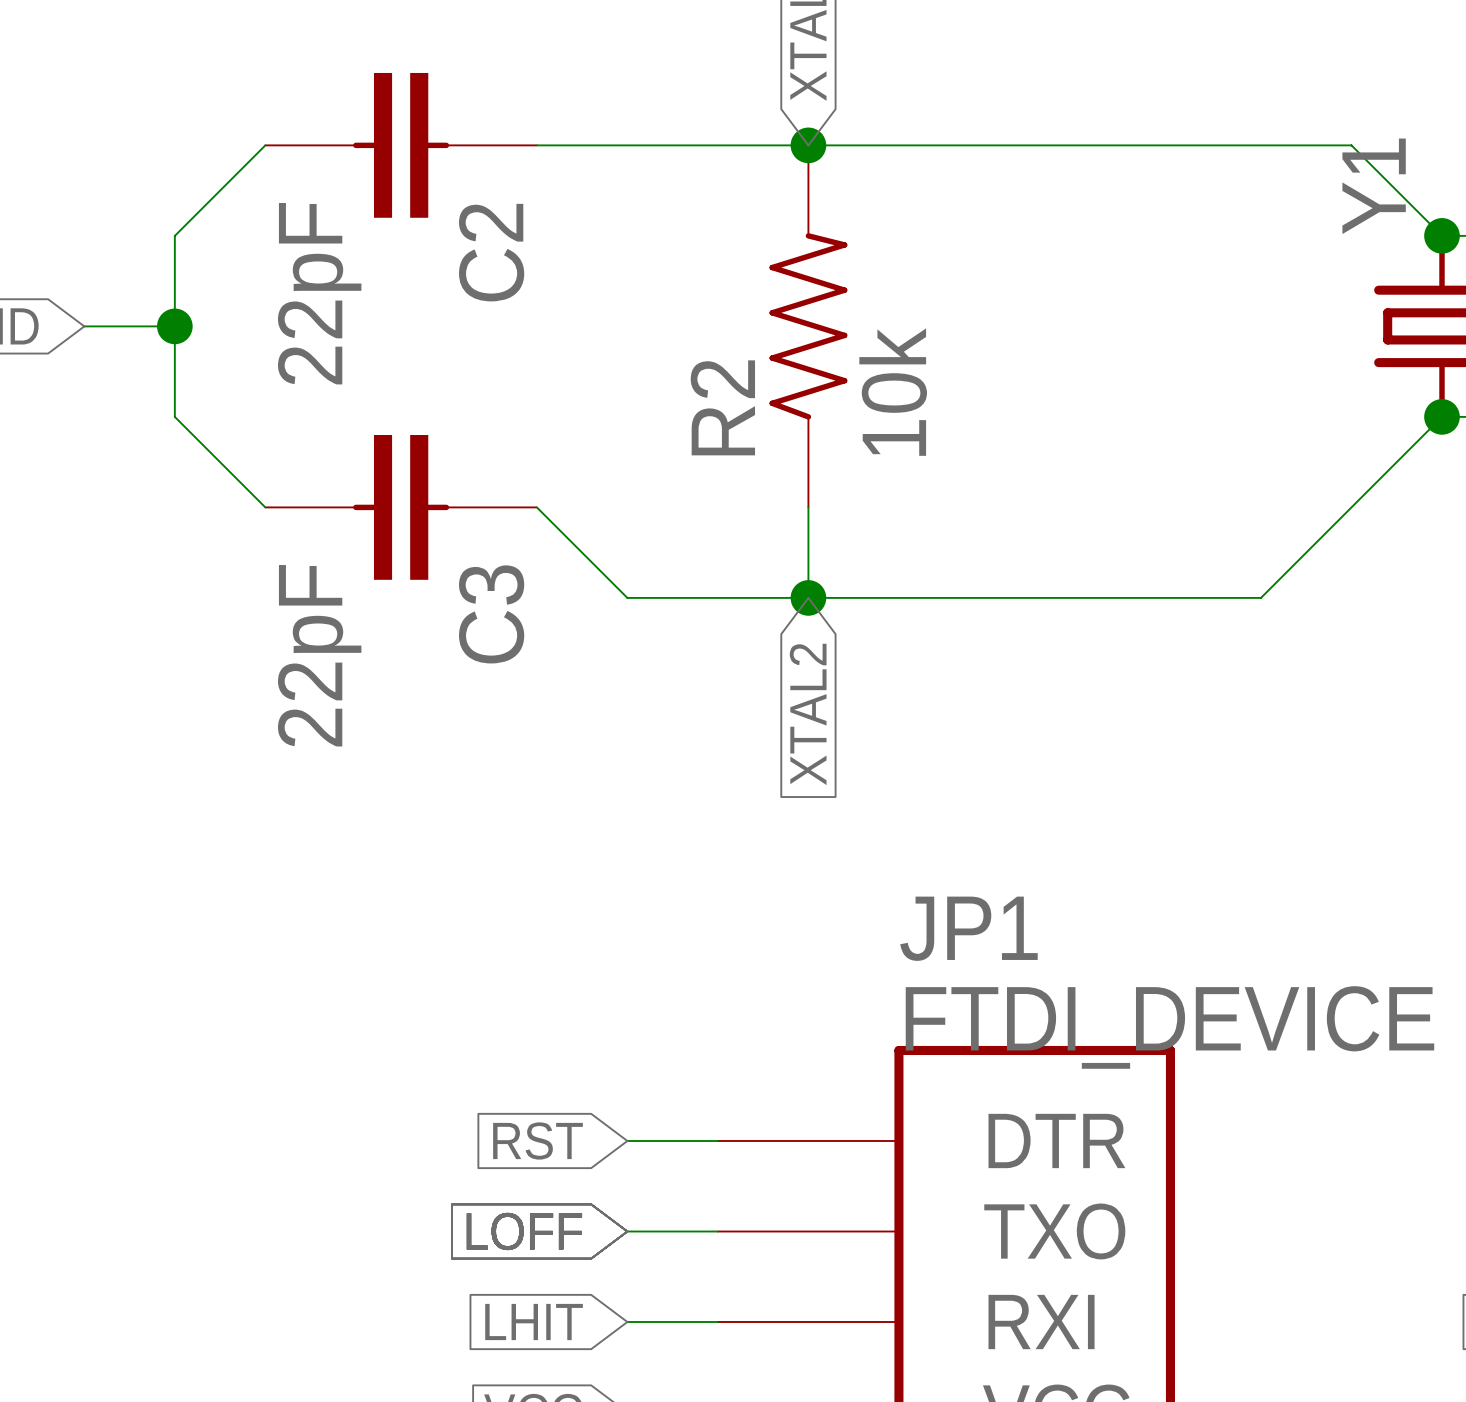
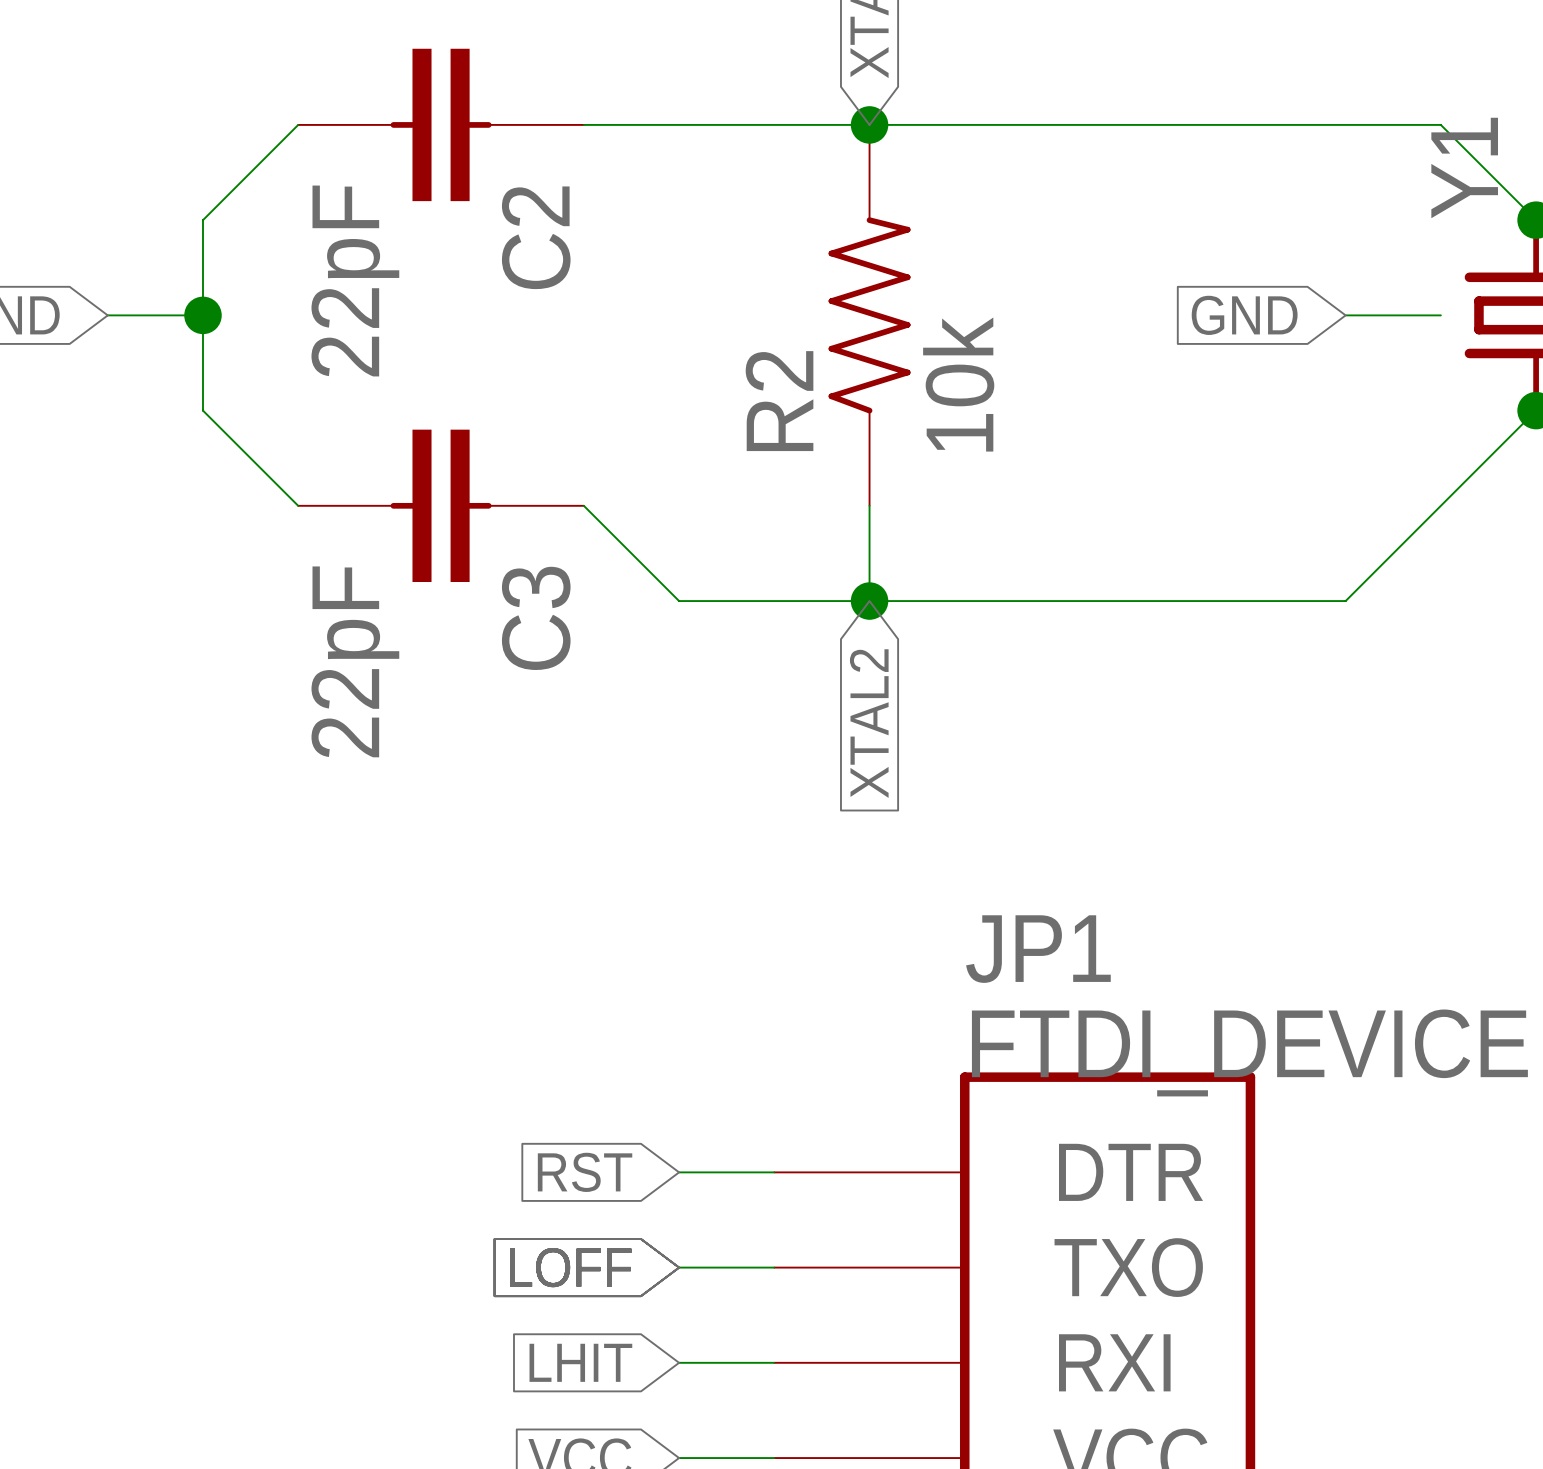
global label: none -> GND (1244, 315)
wire: none -> (1345, 315) (1440, 315)

